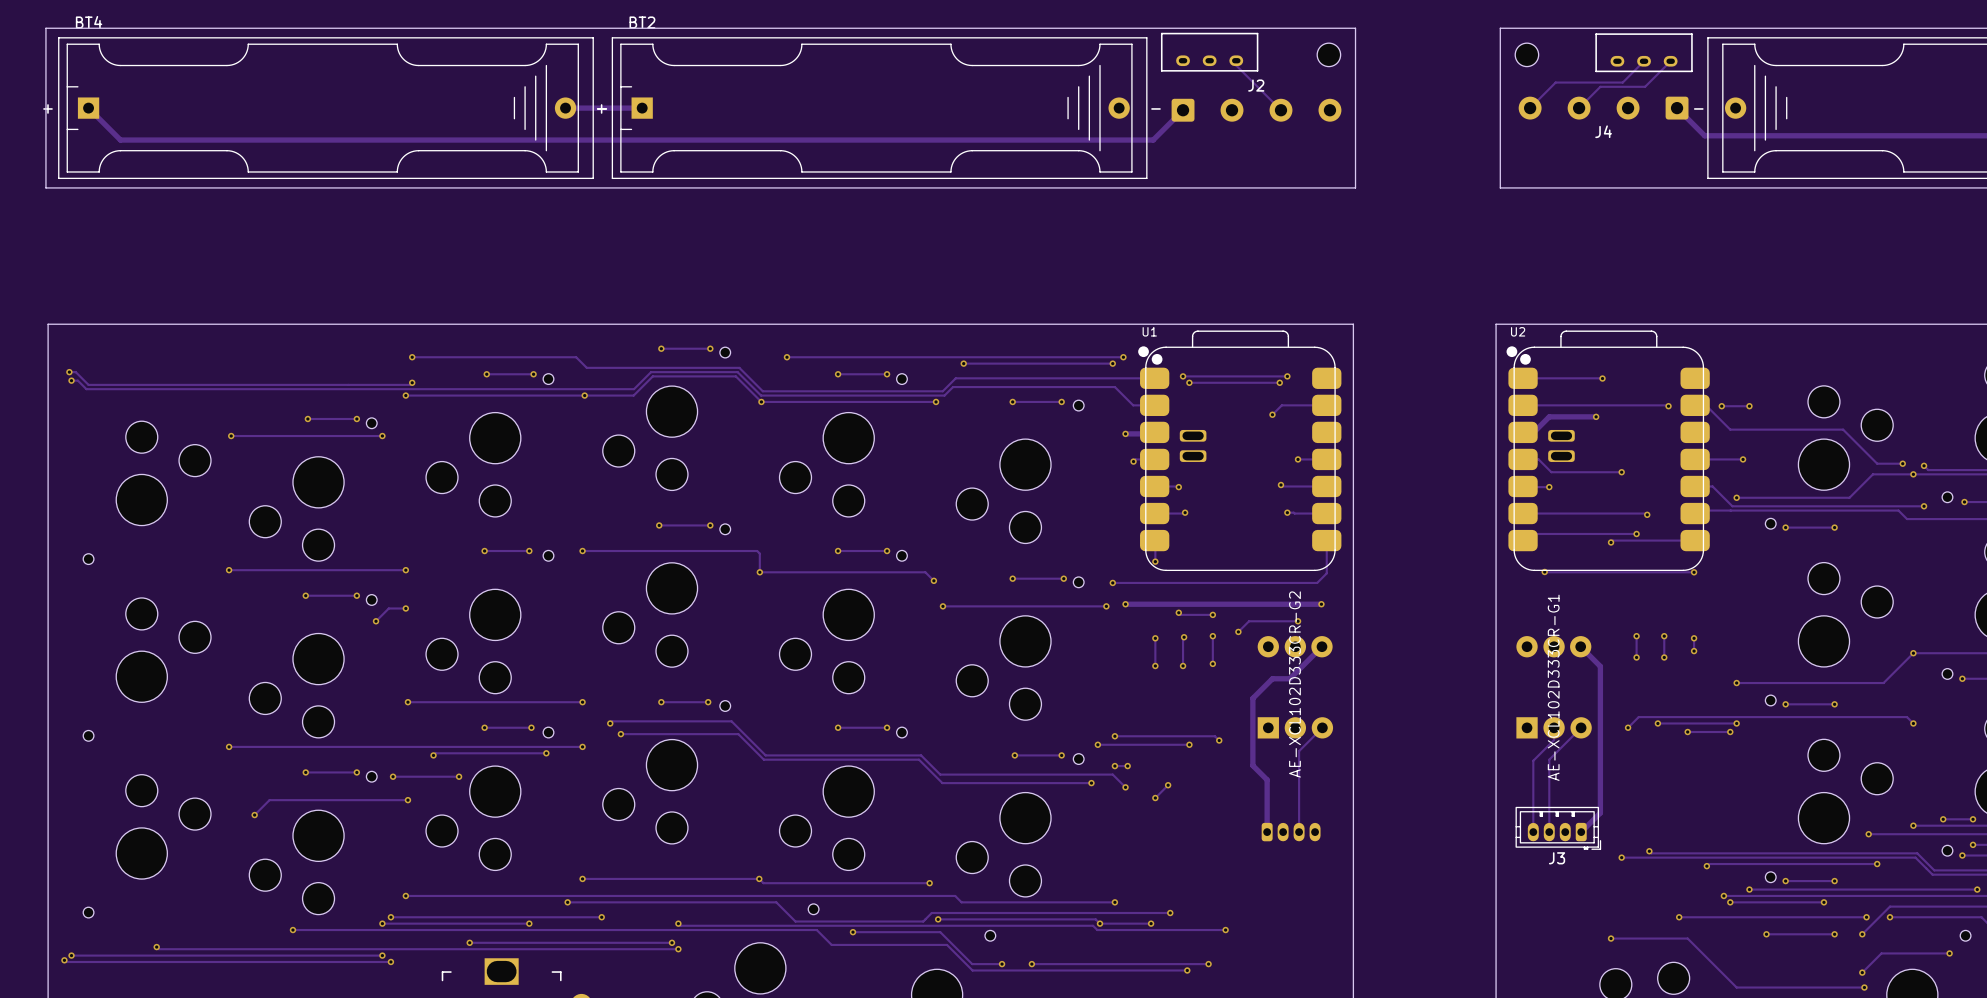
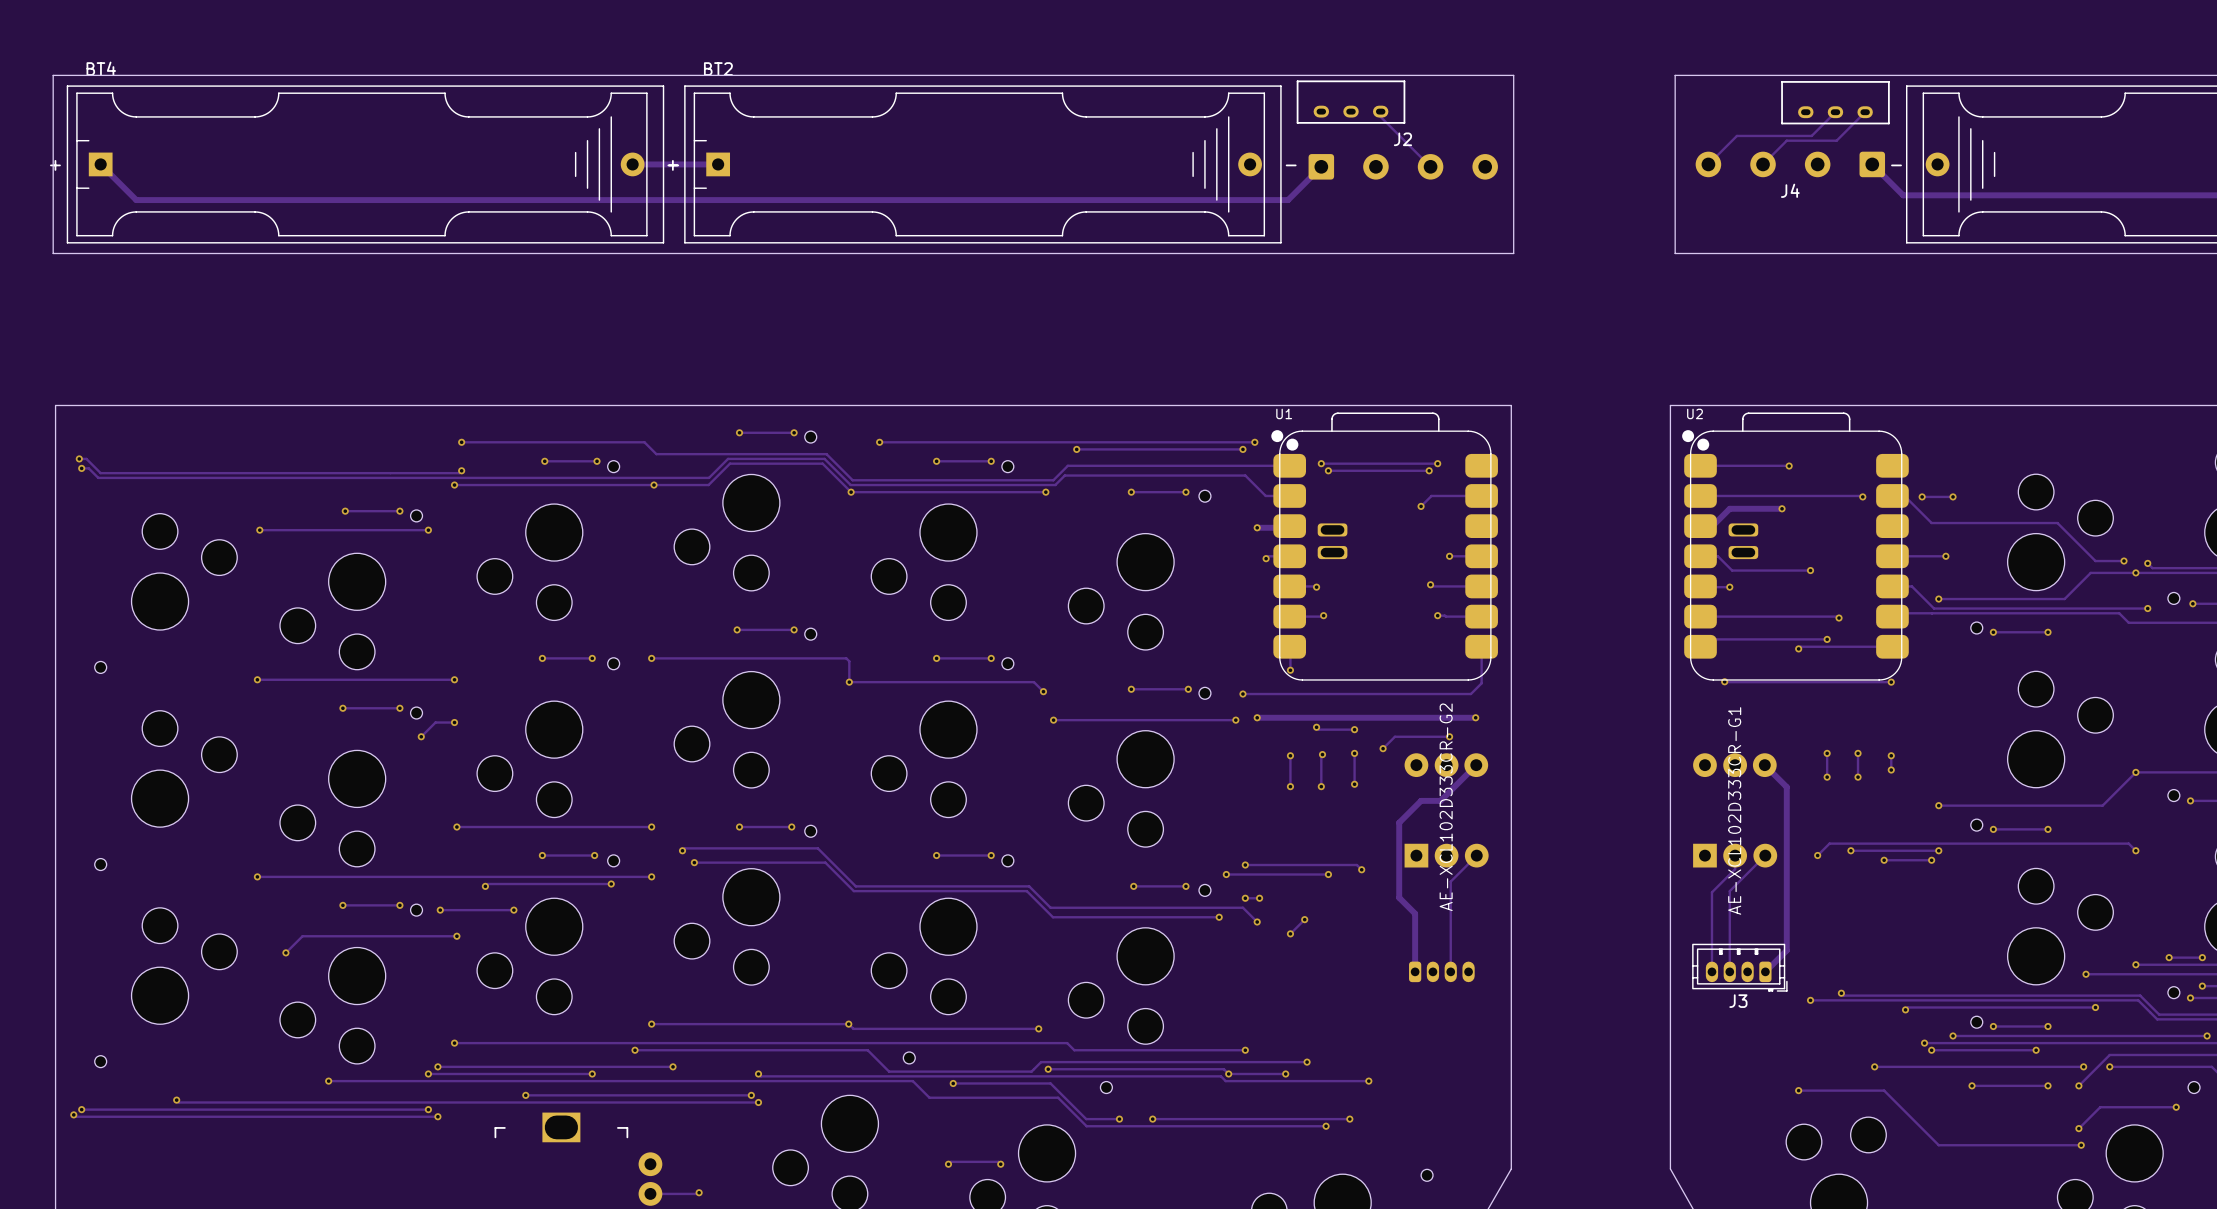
part: (1328, 54) -> none
part: (1526, 54) -> none

